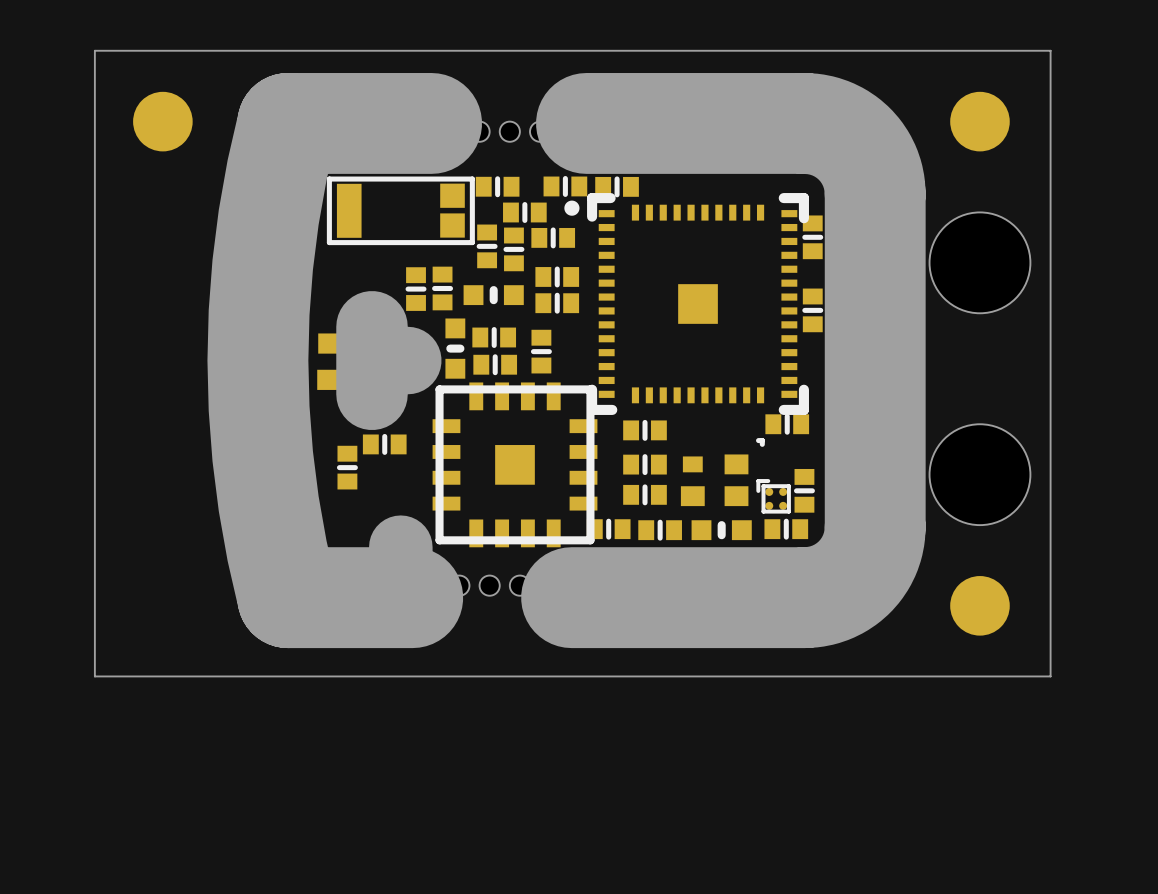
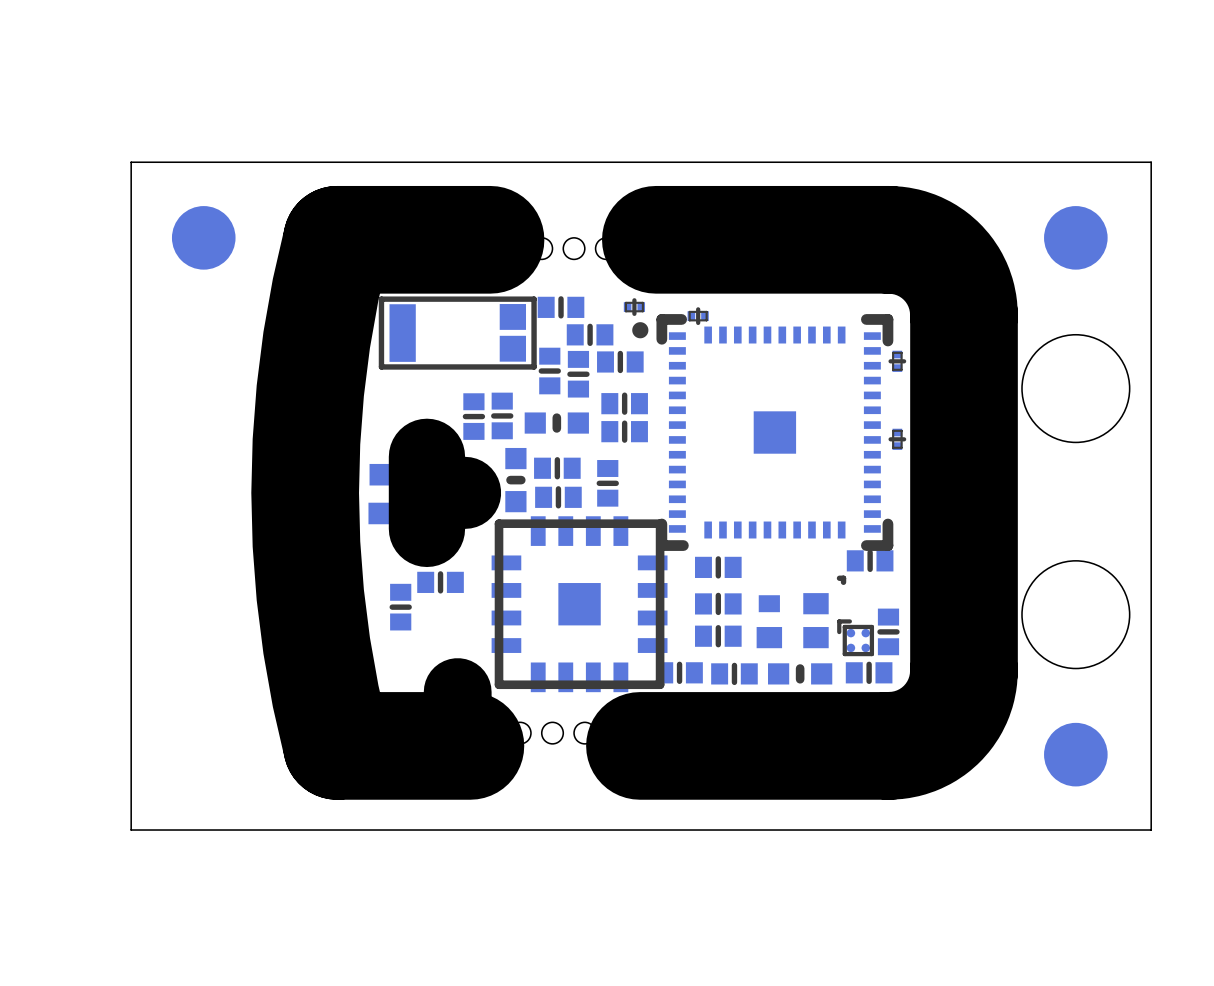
part footprint: [543, 176, 588, 197] -> [623, 298, 646, 316]
part footprint: [595, 176, 639, 198] -> [687, 307, 709, 326]
part footprint: [802, 215, 824, 260] -> [888, 350, 907, 372]
part footprint: [802, 288, 824, 333] -> [888, 428, 907, 450]

